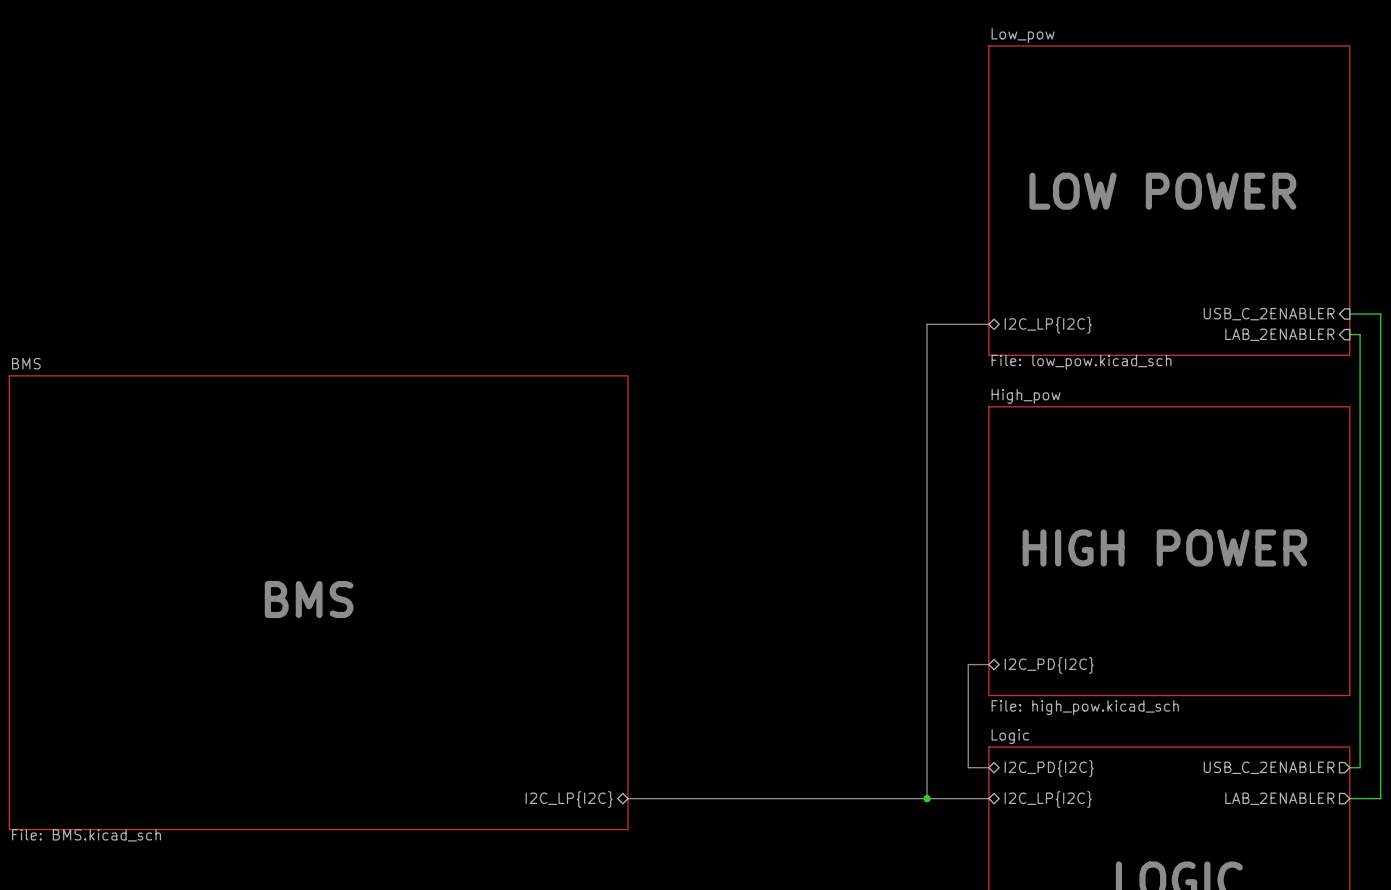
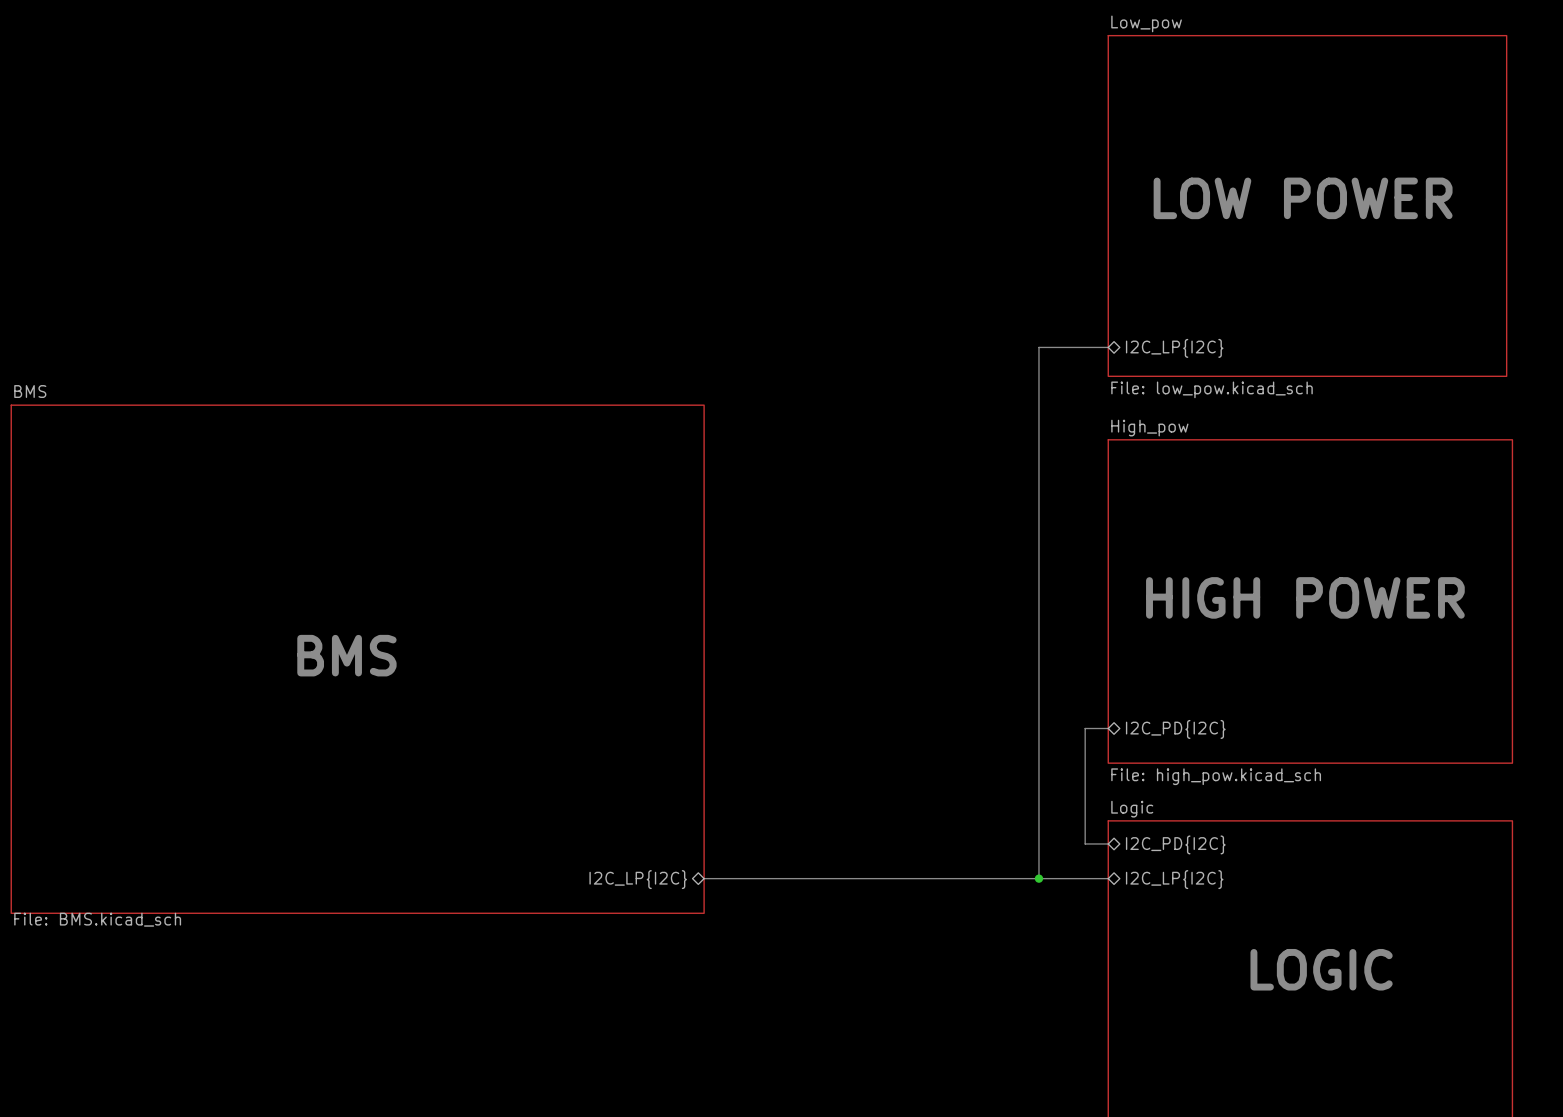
sheet Low_pow shape: [988, 45, 1351, 356] -> [1107, 34, 1508, 377]
sheet pin: USB_C_2ENABLER (1269, 314) -> none
wire: (1349, 314) (1380, 314) (1380, 798) (1349, 798) -> none
sheet pin: LAB_2ENABLER (1279, 334) -> none
wire: (1349, 334) (1360, 334) (1360, 767) (1349, 767) -> none
sheet pin: USB_C_2ENABLER (1269, 767) -> none
sheet pin: LAB_2ENABLER (1279, 798) -> none

